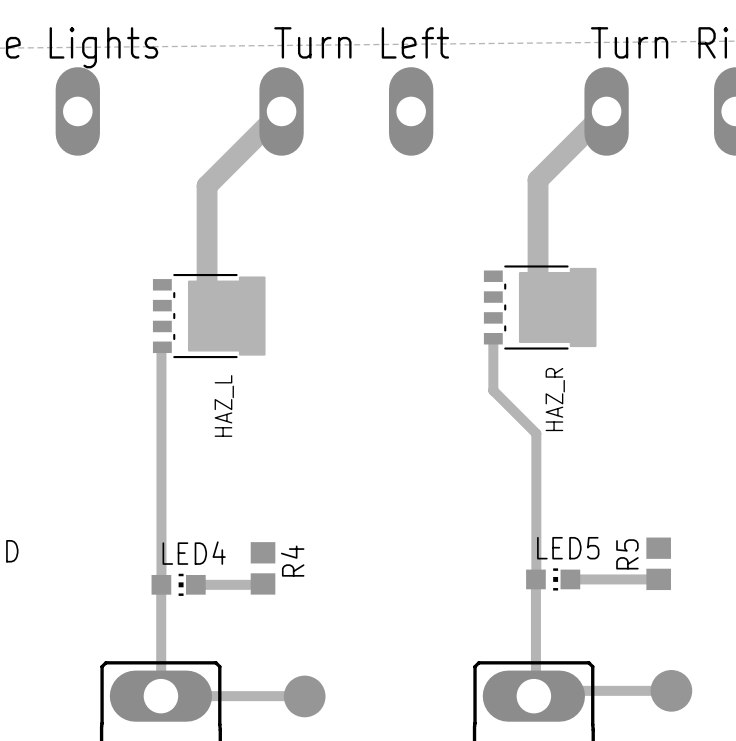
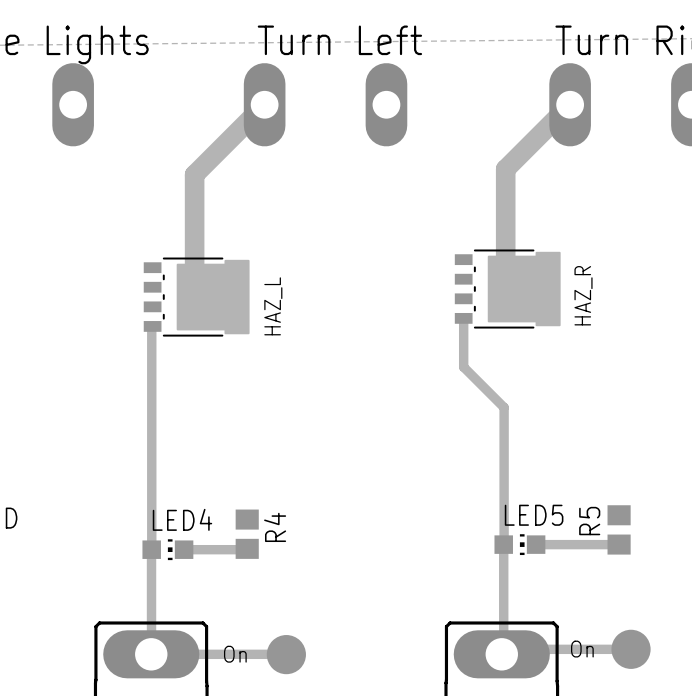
HAZ_R name position: HAZ_R (555, 399) -> HAZ_R (583, 295)
HAZ_L name position: HAZ_L (224, 405) -> HAZ_L (273, 306)
text: none -> On (582, 649)
text: none -> On (235, 654)

